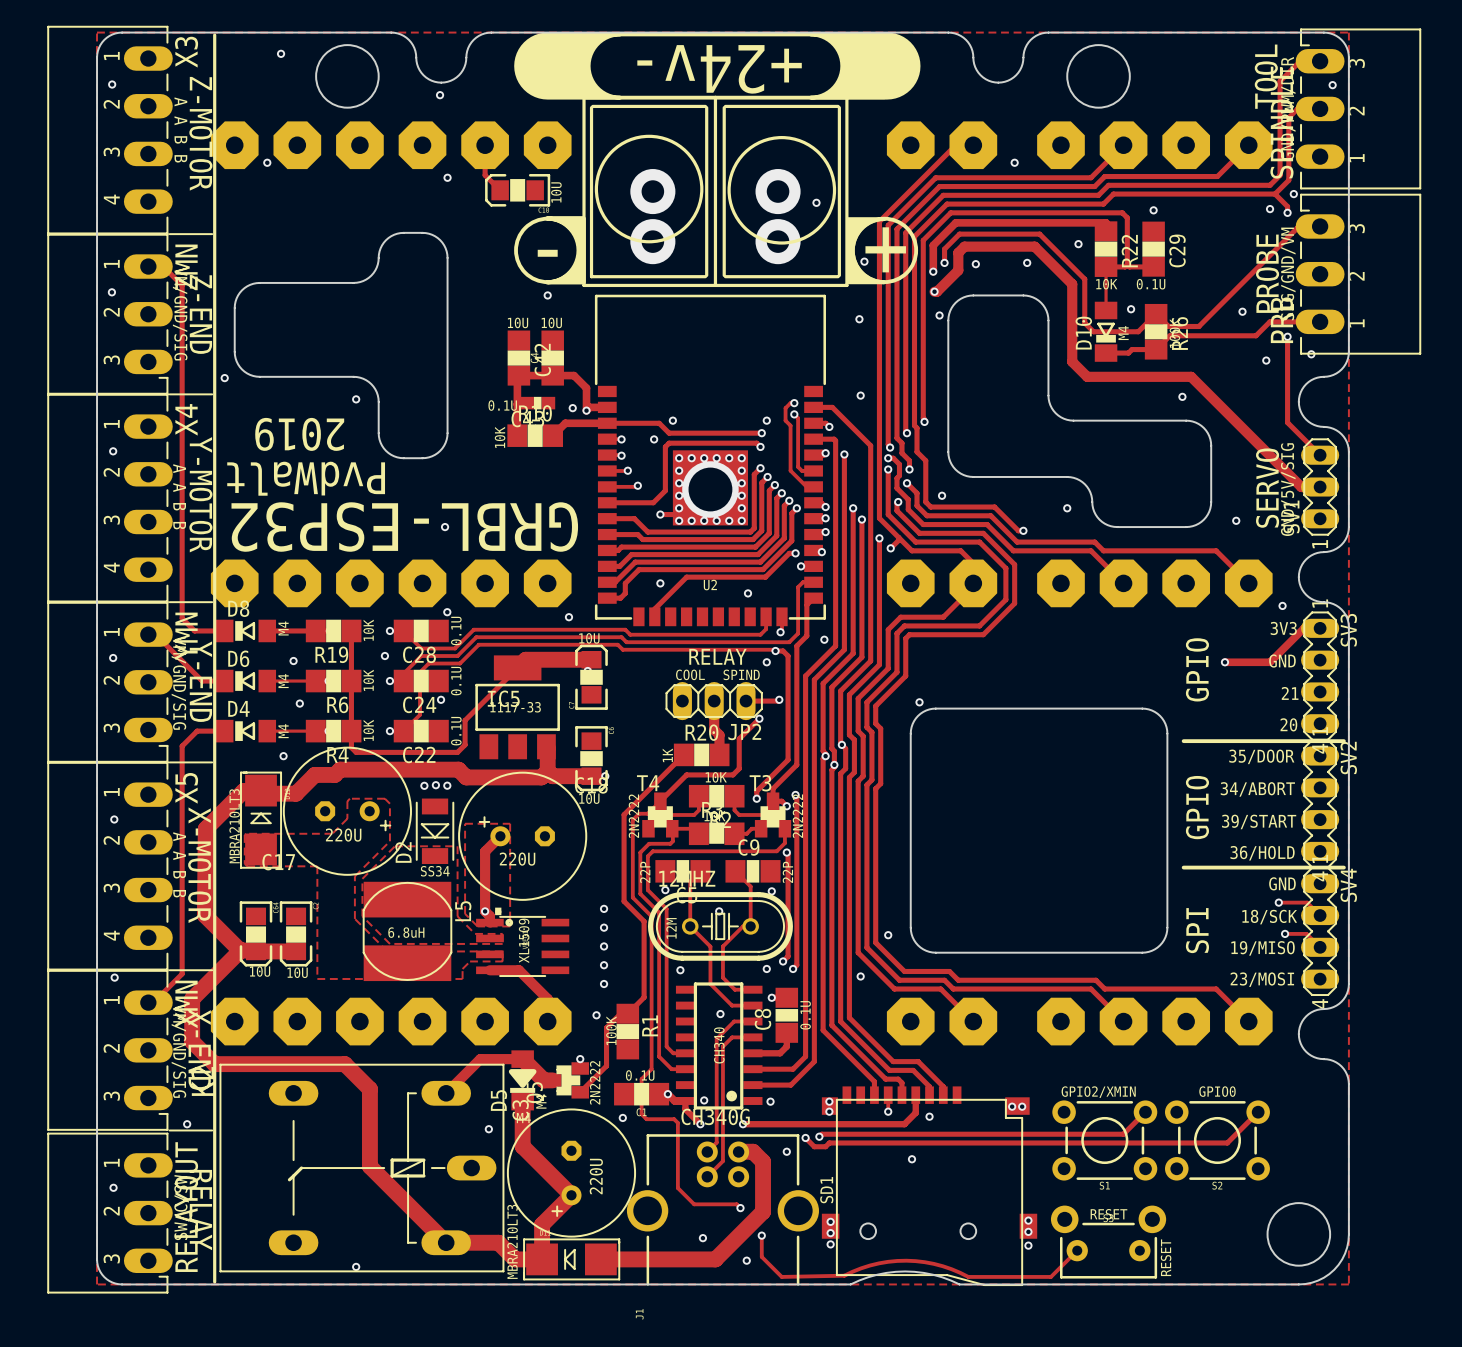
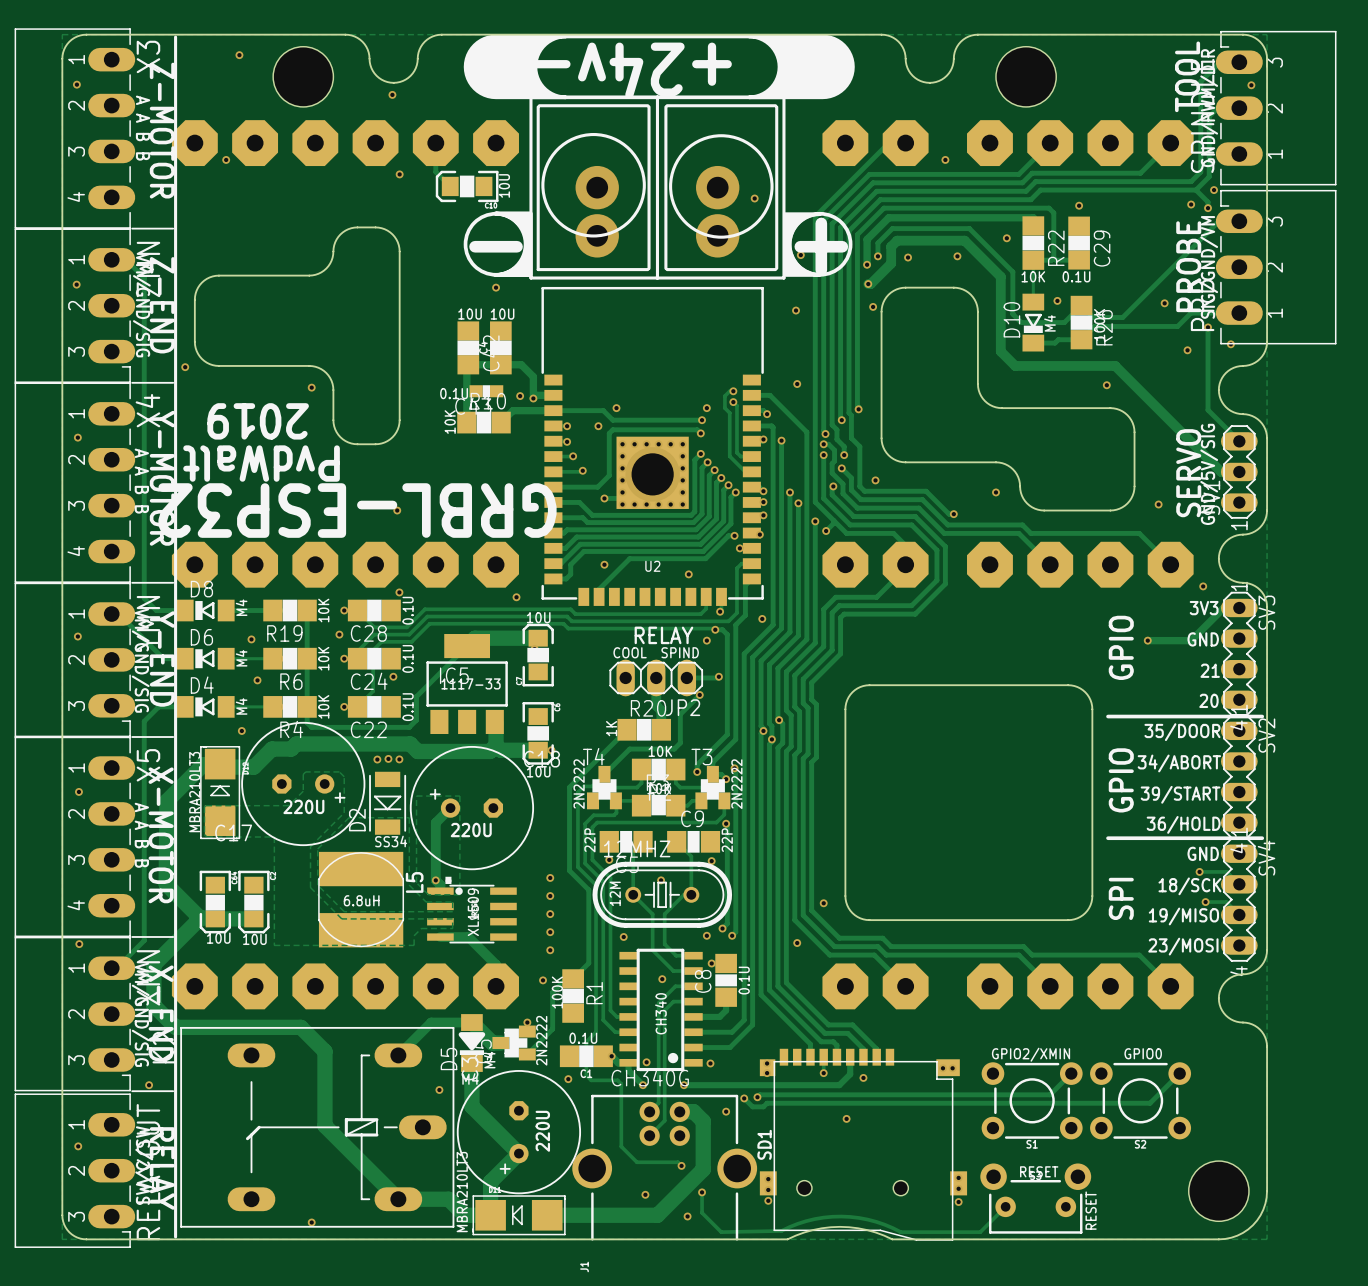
via: (919, 702) -> none

